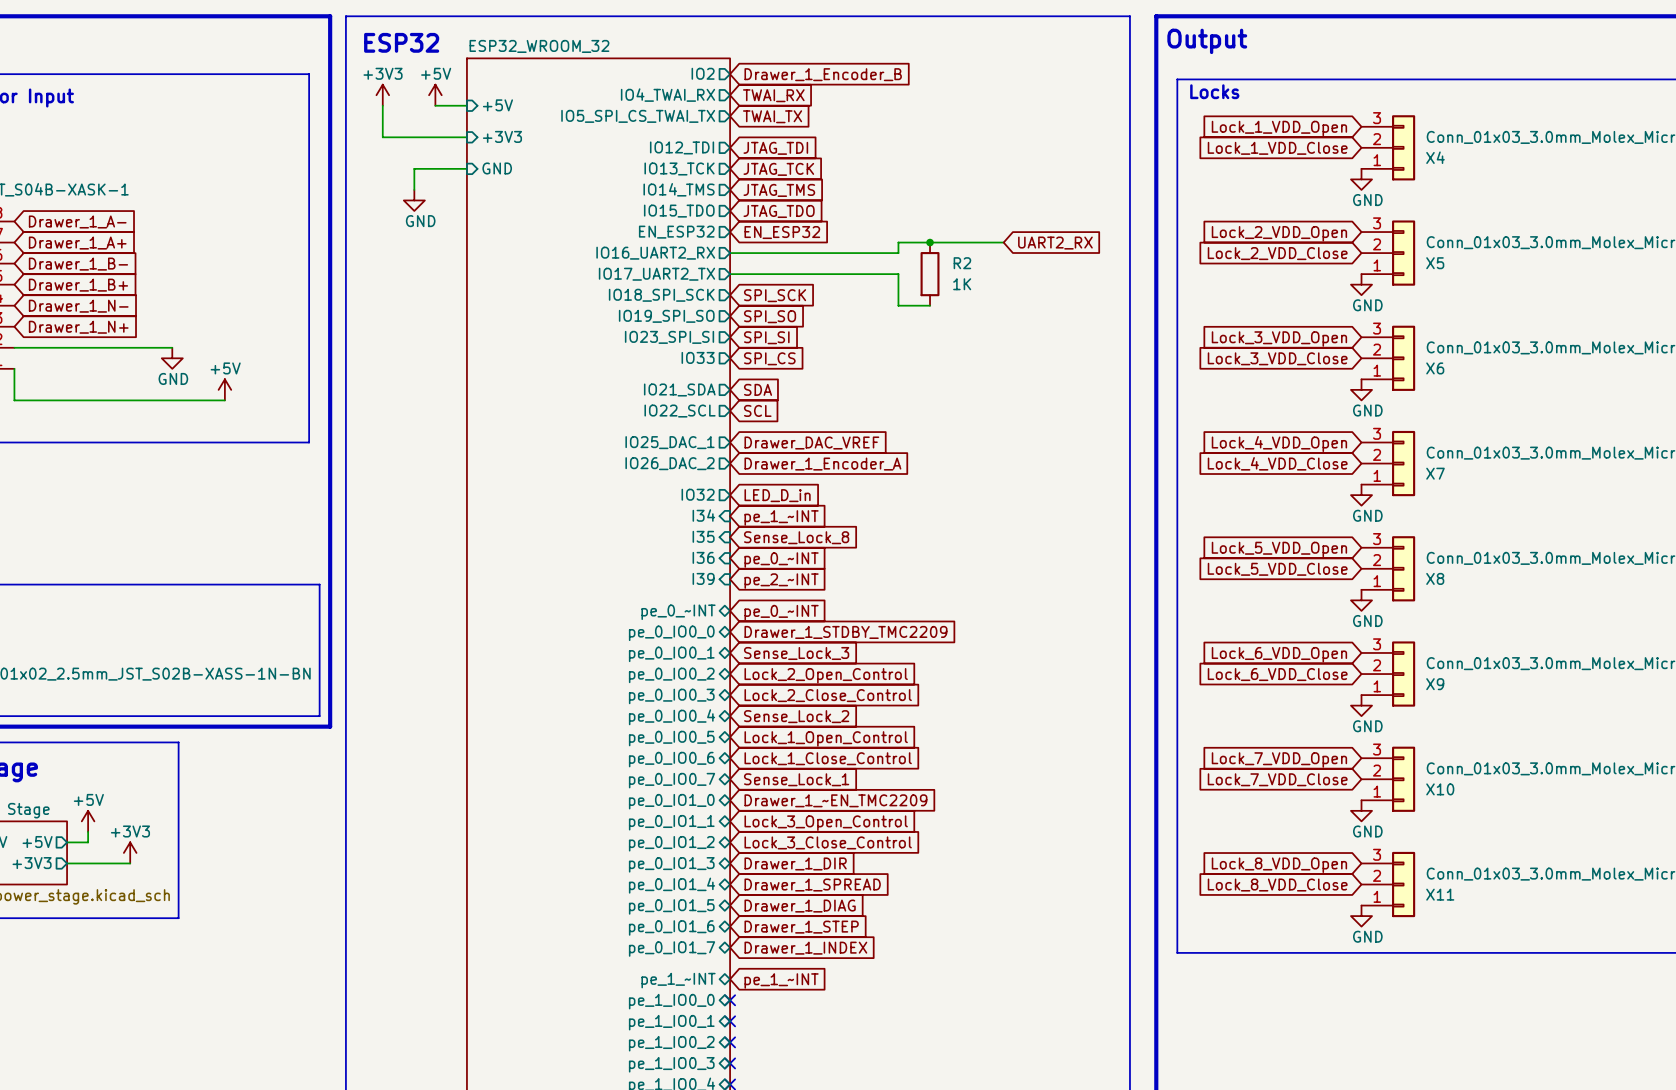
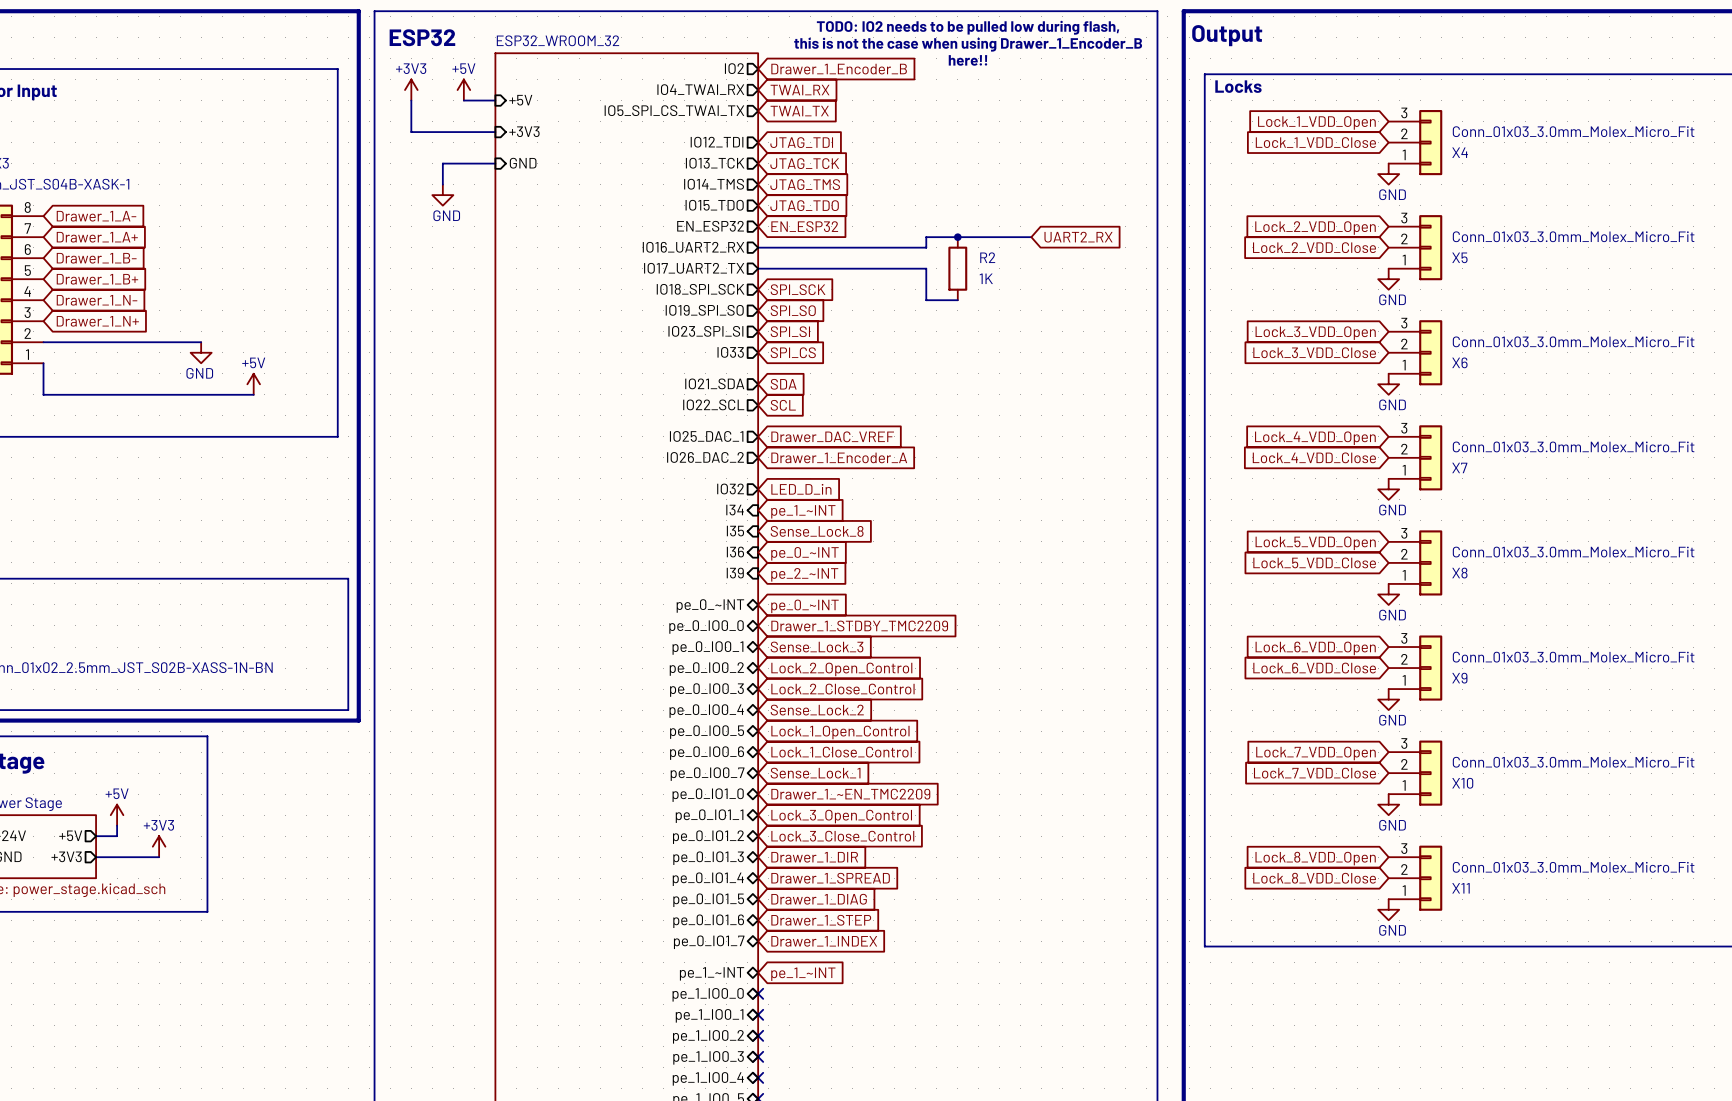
text: none -> TODO: IO2 needs to be pulled low during flash, (968, 27)
text: none -> this is not the case when using Drawer_1_Encoder_B (968, 44)
text: none -> here!! (967, 60)

